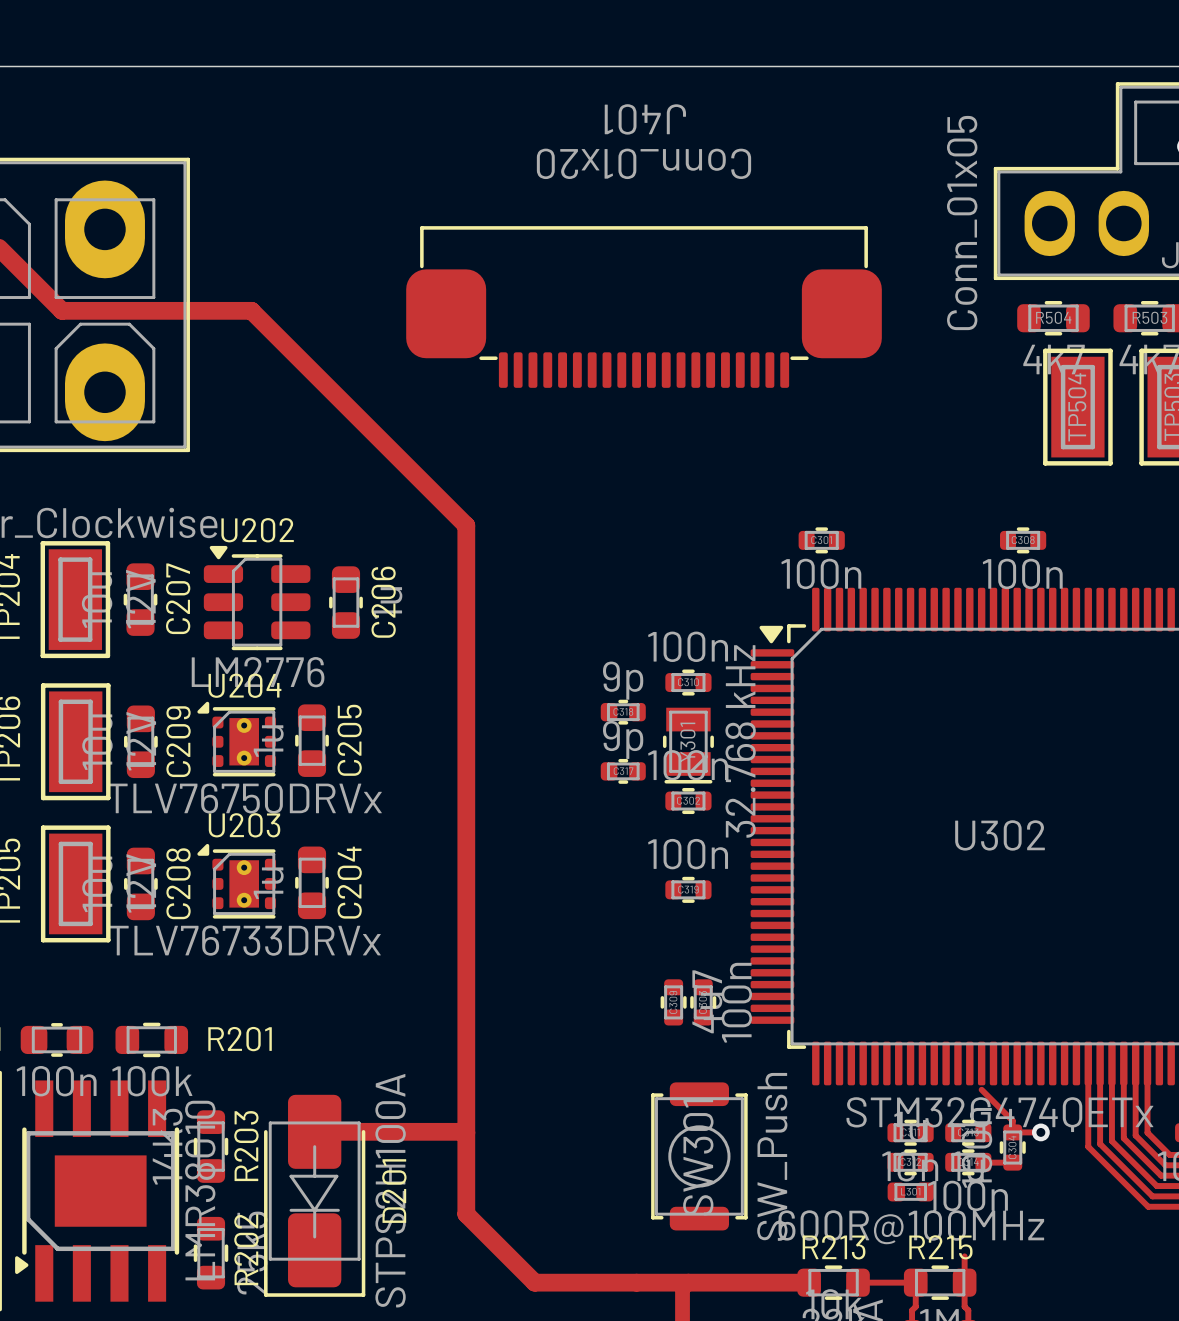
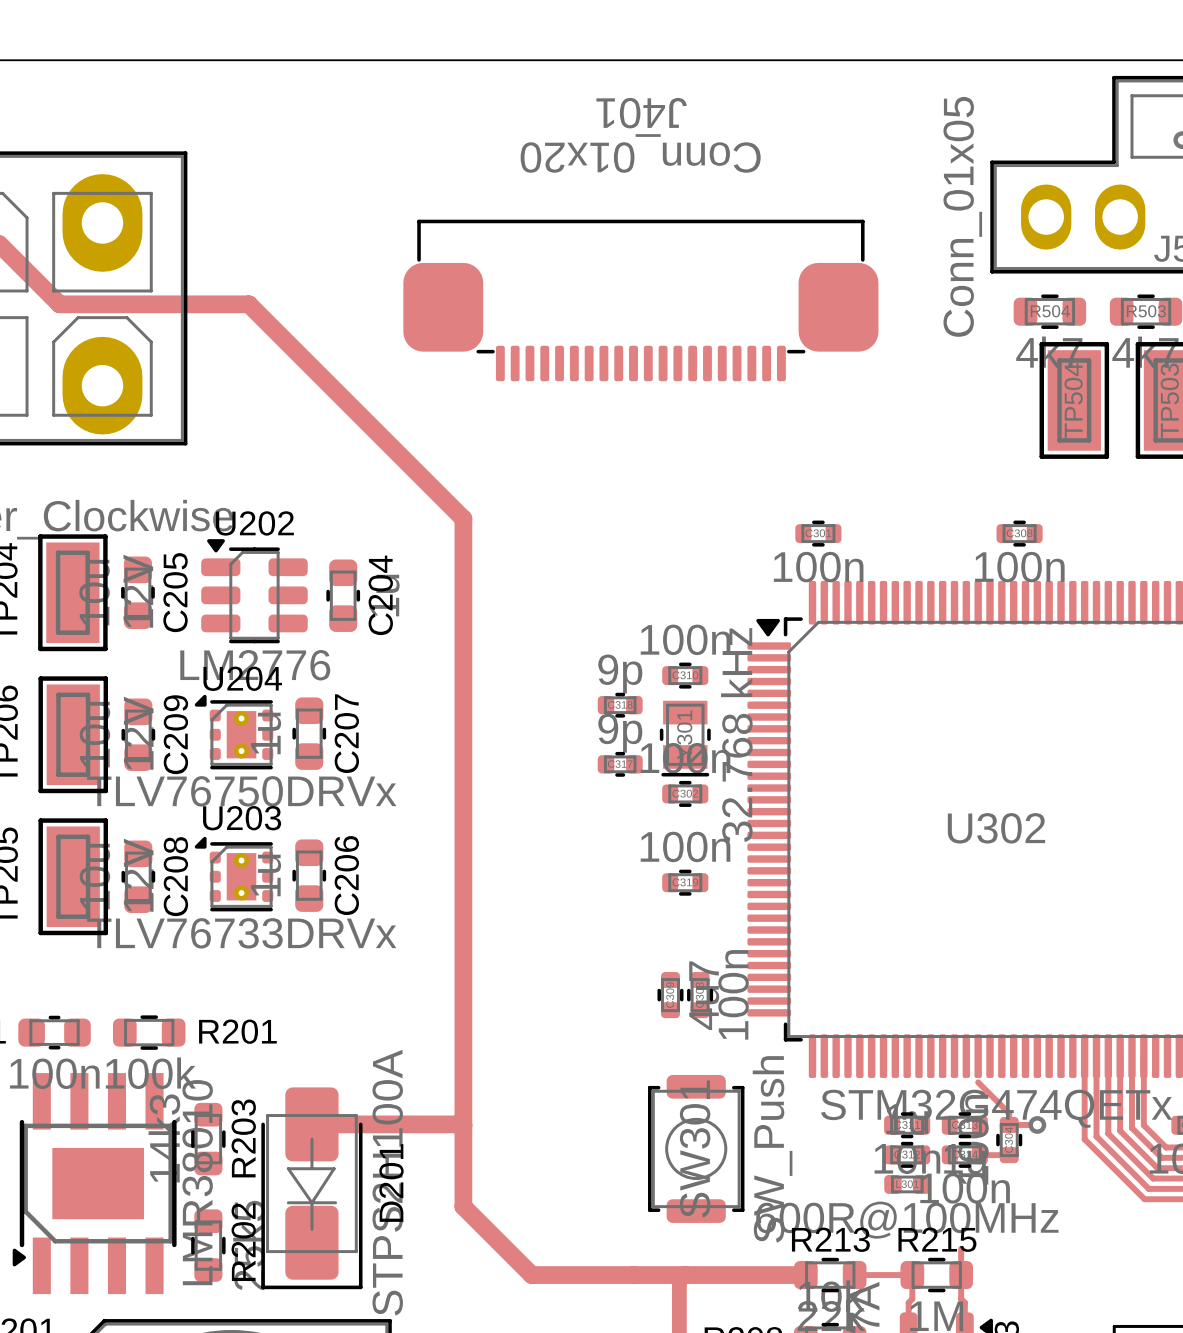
C207 name: C207 (178, 598) -> C205 (175, 592)
C206 name: C206 (383, 602) -> C204 (380, 595)
C205 name: C205 (349, 740) -> C207 (346, 733)
C204 name: C204 (349, 882) -> C206 (346, 875)

